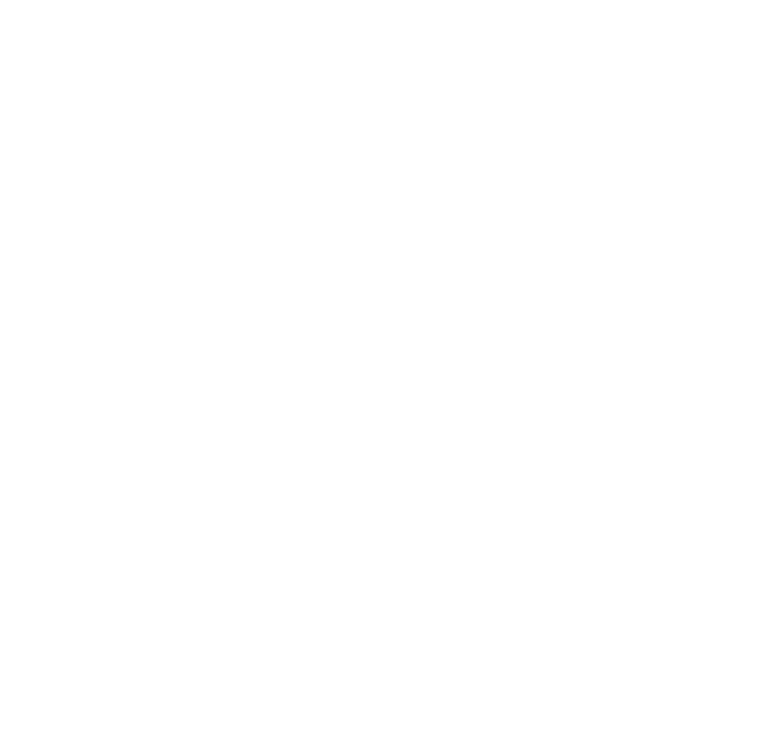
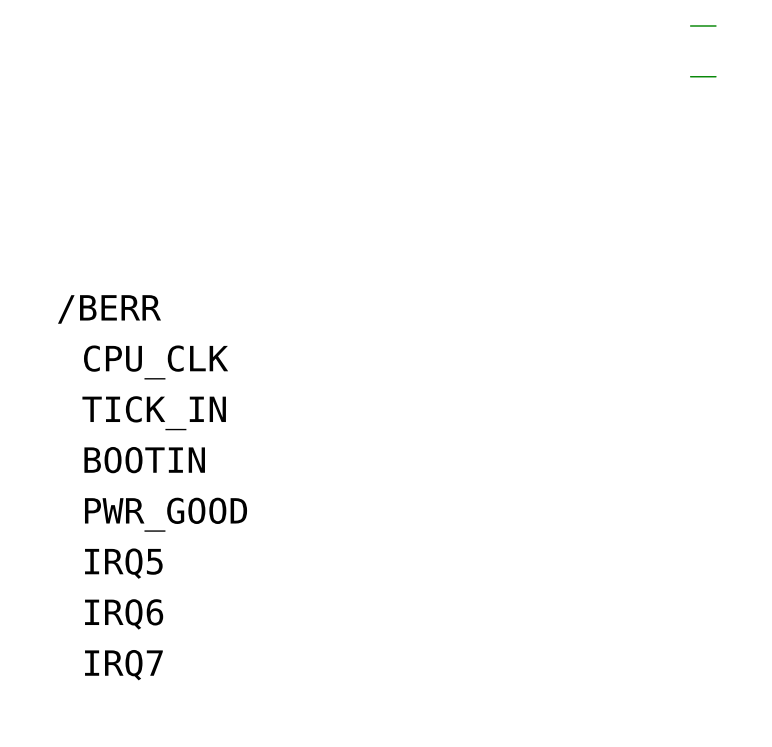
wire: none -> (690, 25) (715, 25)
wire: none -> (690, 76) (715, 76)
label: none -> /BERR (109, 309)
label: none -> CPU_CLK (156, 362)
label: none -> TICK_IN (154, 413)
label: none -> BOOTIN (144, 460)
label: none -> PWR_GOOD (166, 514)
label: none -> IRQ5 (123, 563)
label: none -> IRQ6 (124, 614)
label: none -> IRQ7 (123, 665)

